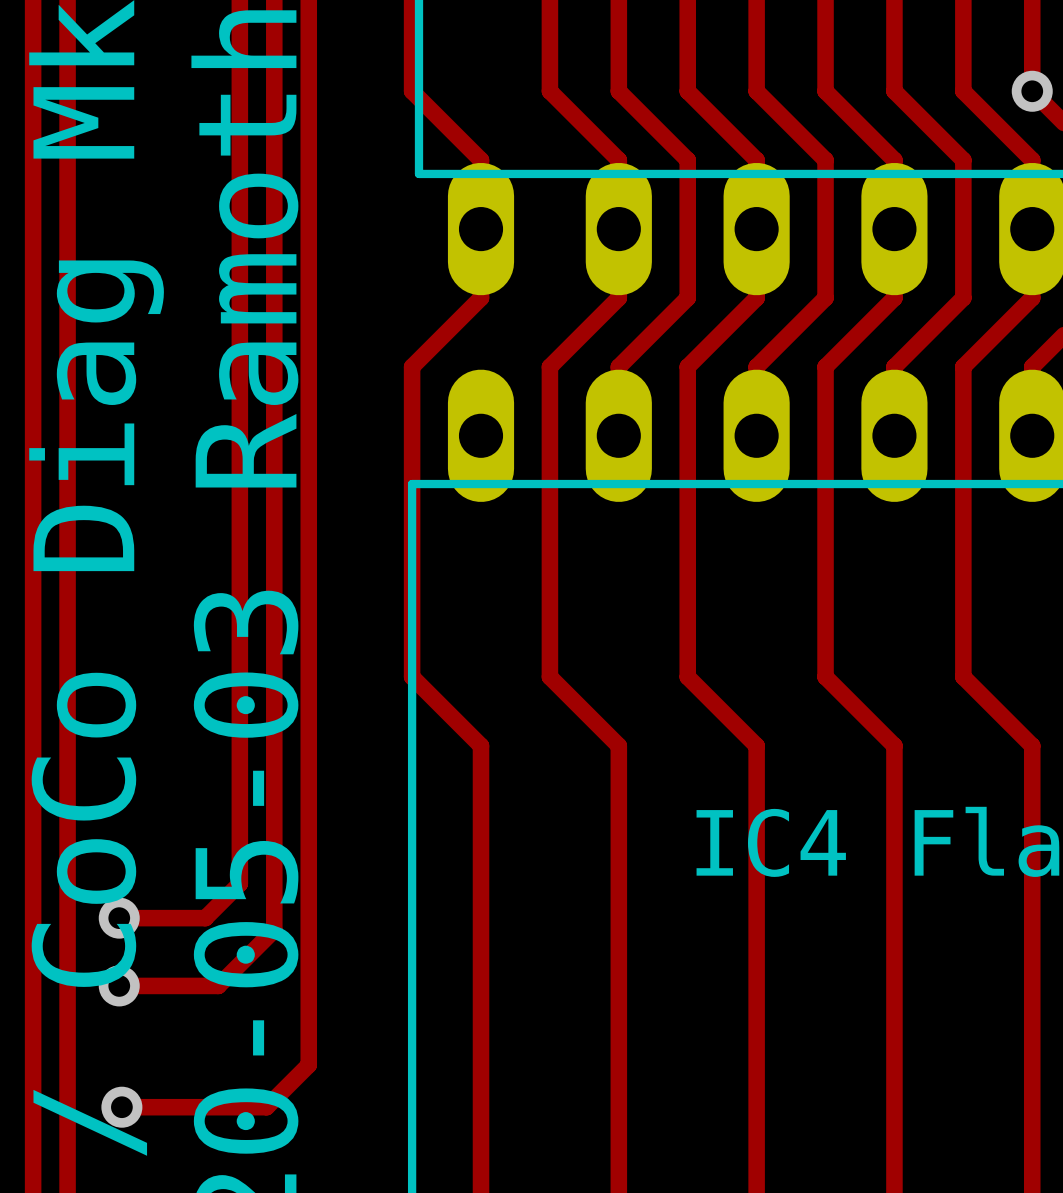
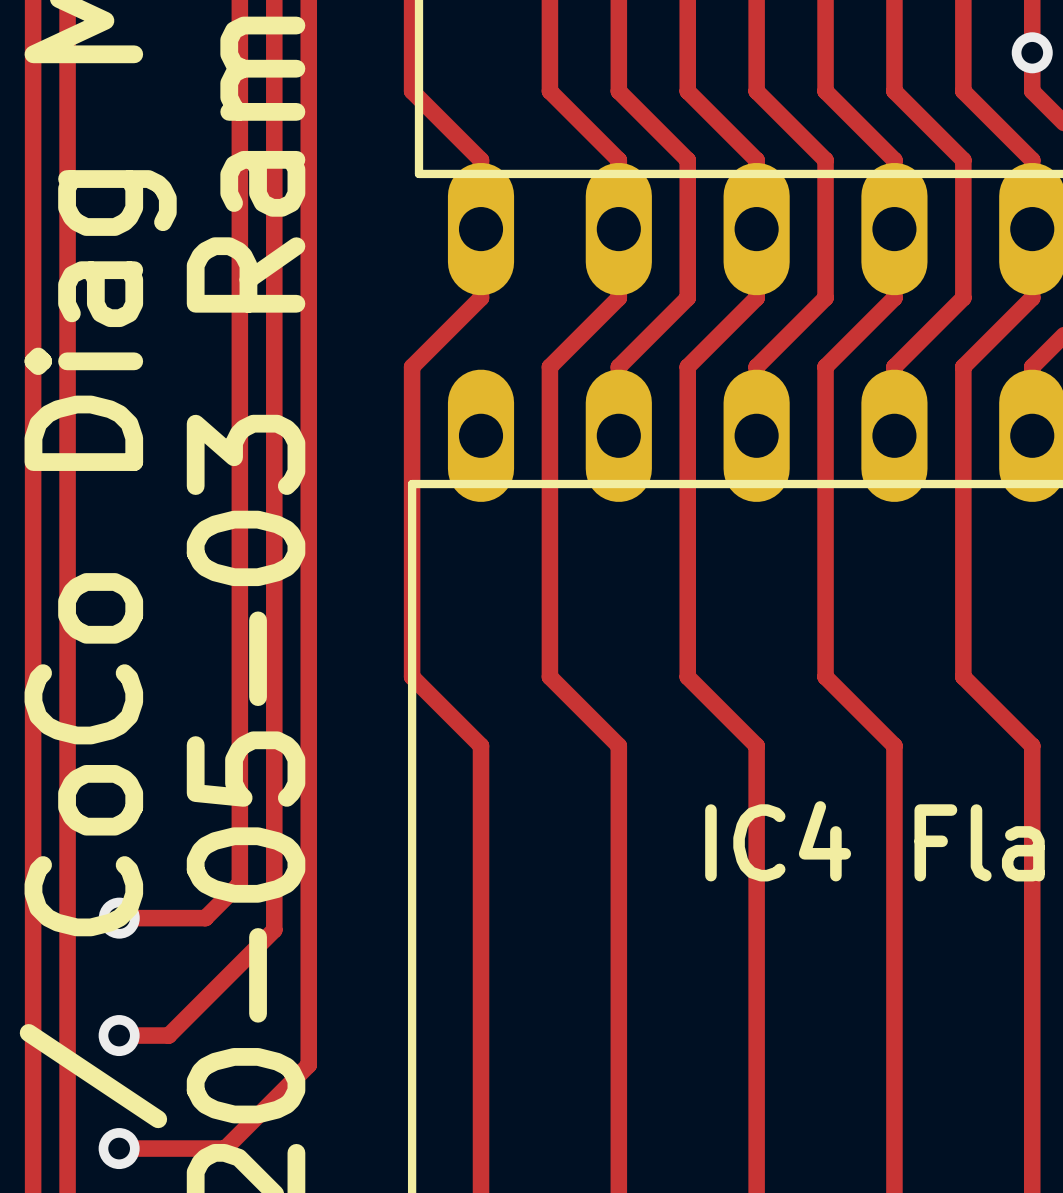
via position: (1032, 91) -> (1032, 52)
track: (119, 985) (218, 985) -> (119, 1035) (168, 1035) (218, 985)
via: (119, 985) -> none
via: none -> (119, 1035)
track: (121, 1107) (266, 1107) -> (119, 1148) (225, 1148) (266, 1107)
via: (121, 1107) -> none
via: none -> (119, 1148)

